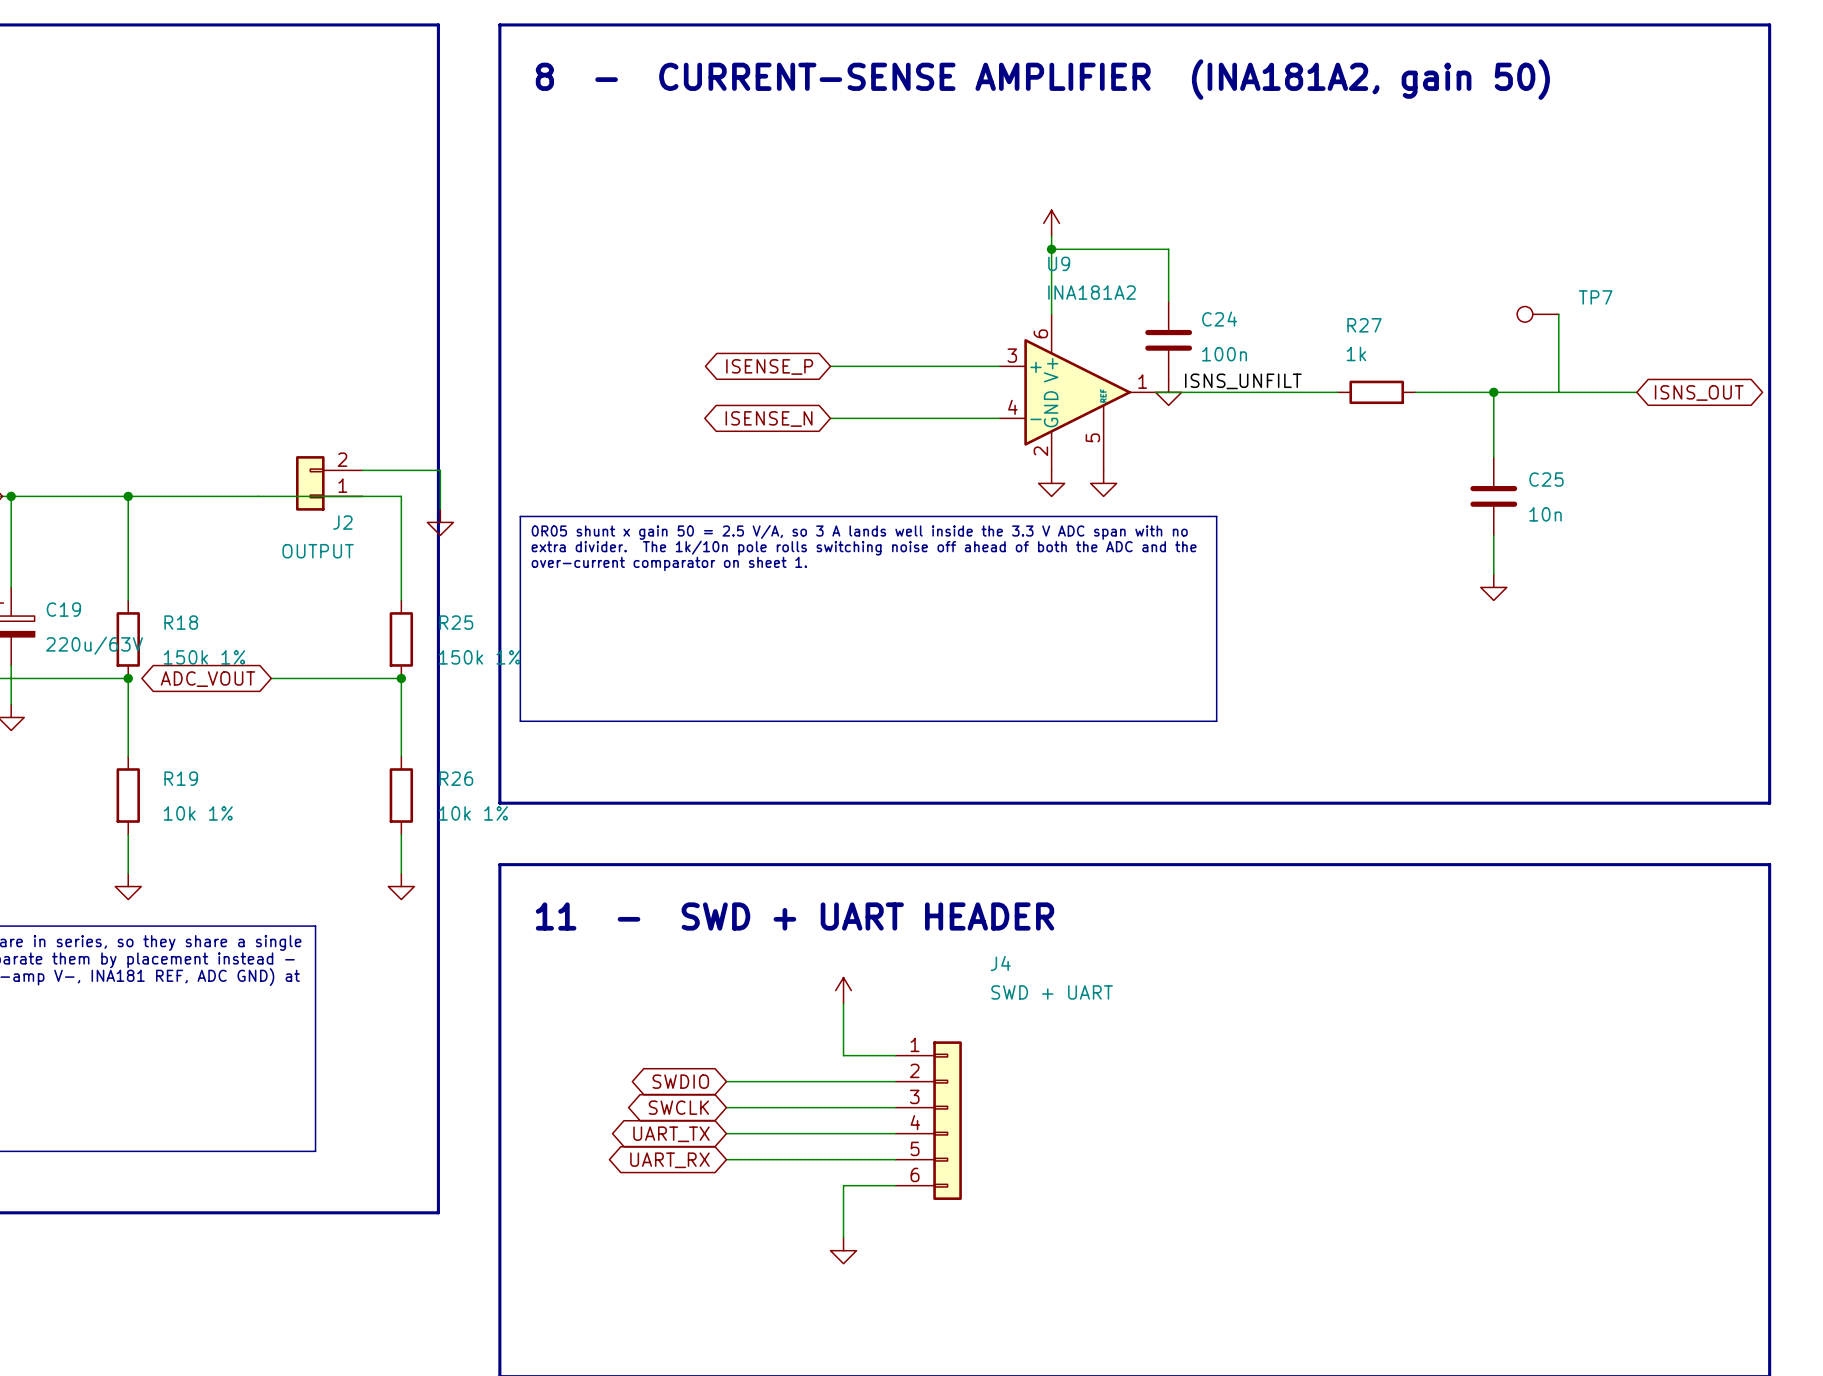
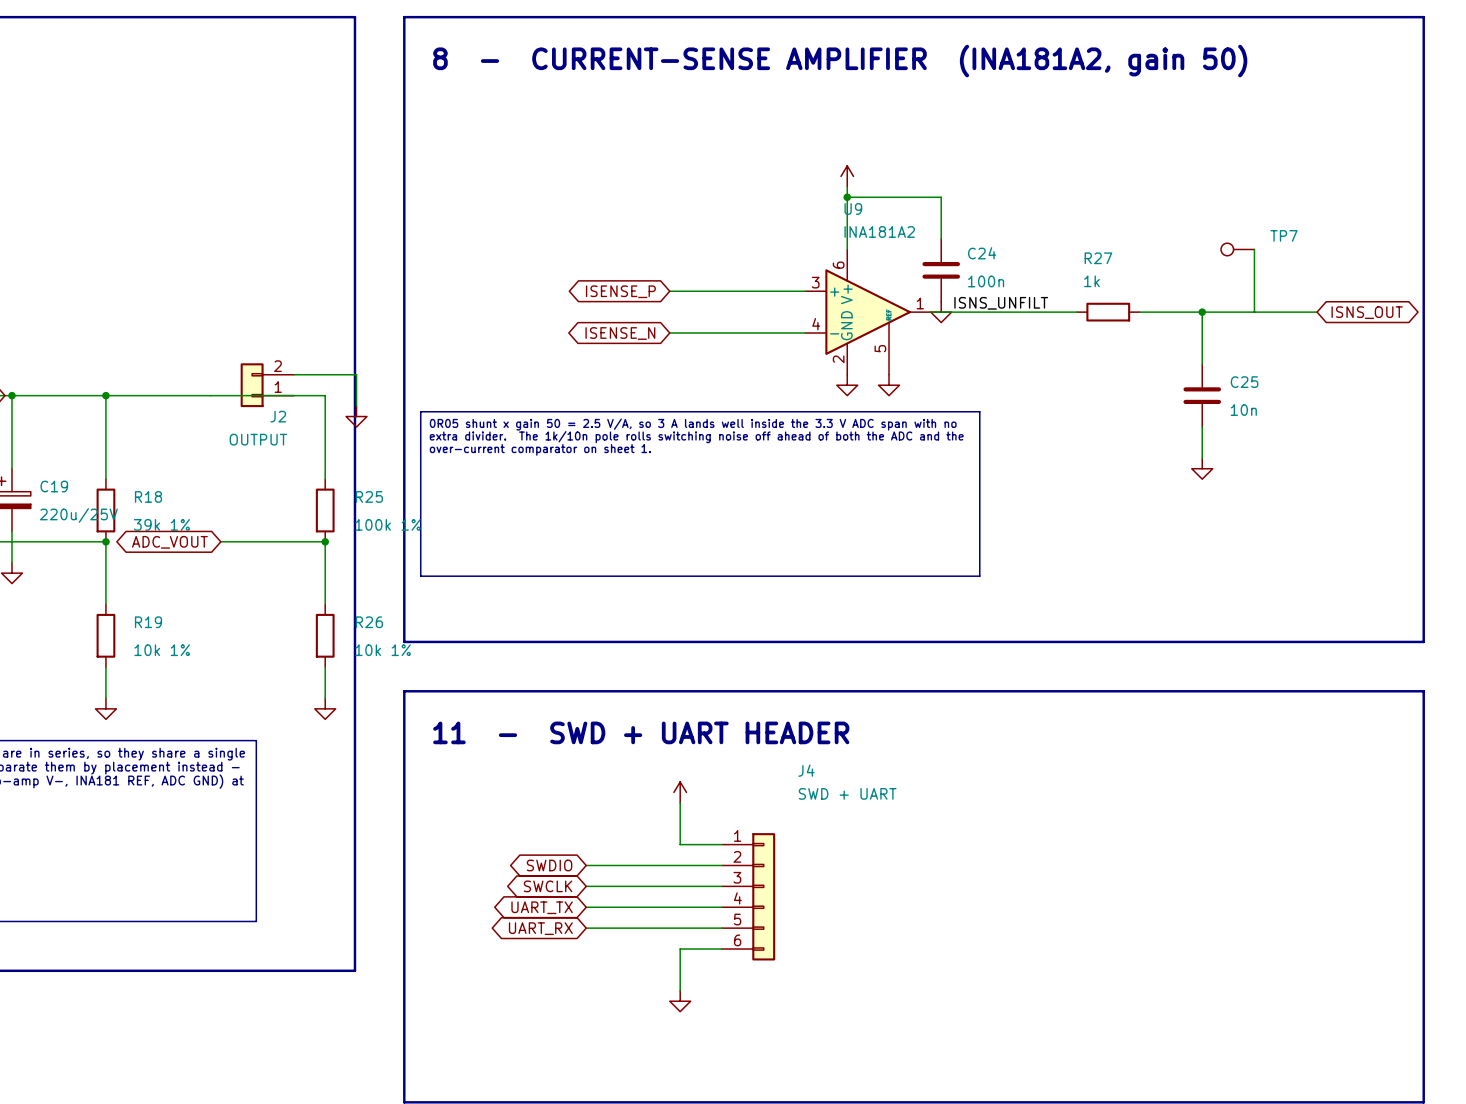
C19 value: 220u/63V (94, 645) -> 220u/25V (78, 515)
R18 value: 150k 1% (204, 657) -> 39k 1% (161, 524)
R25 value: 150k 1% (479, 657) -> 100k 1% (388, 524)

